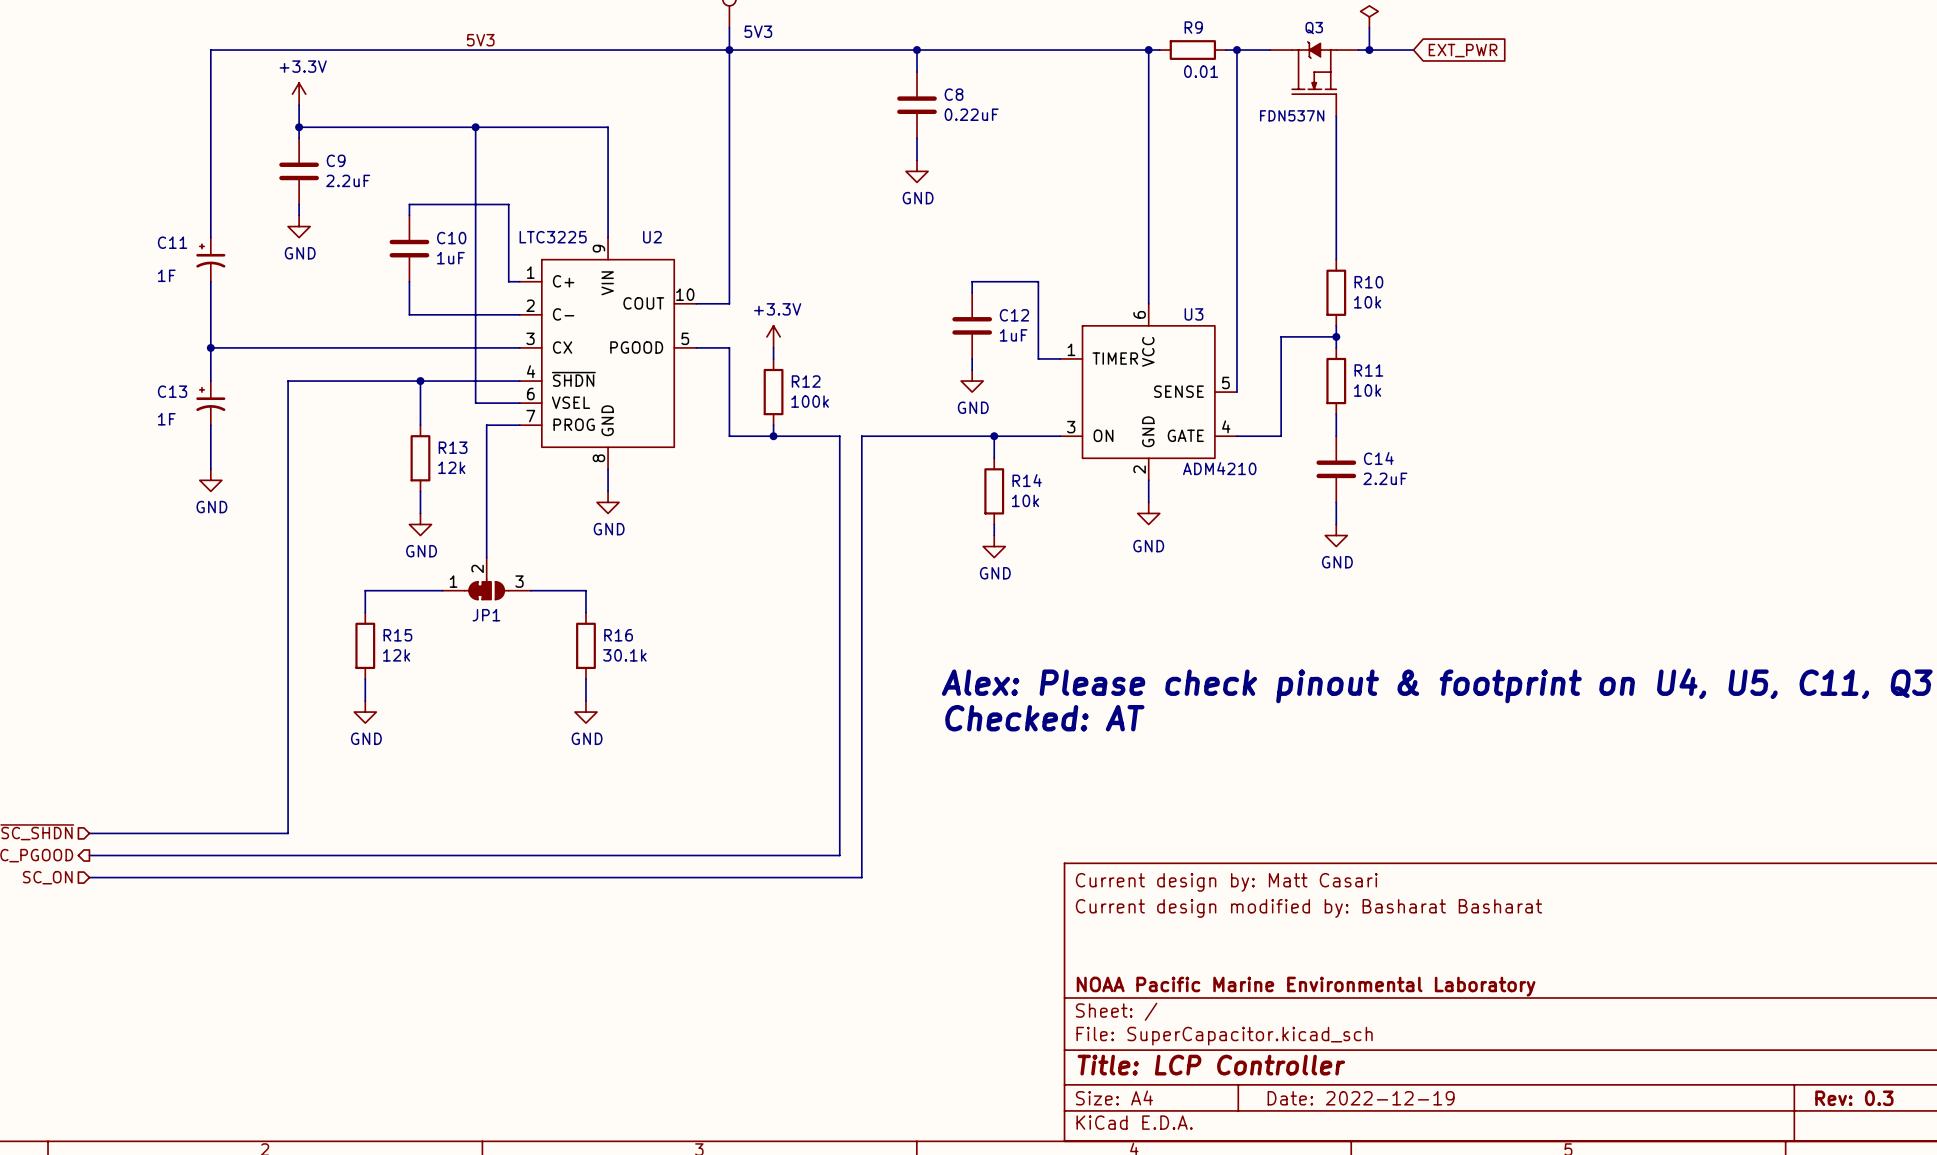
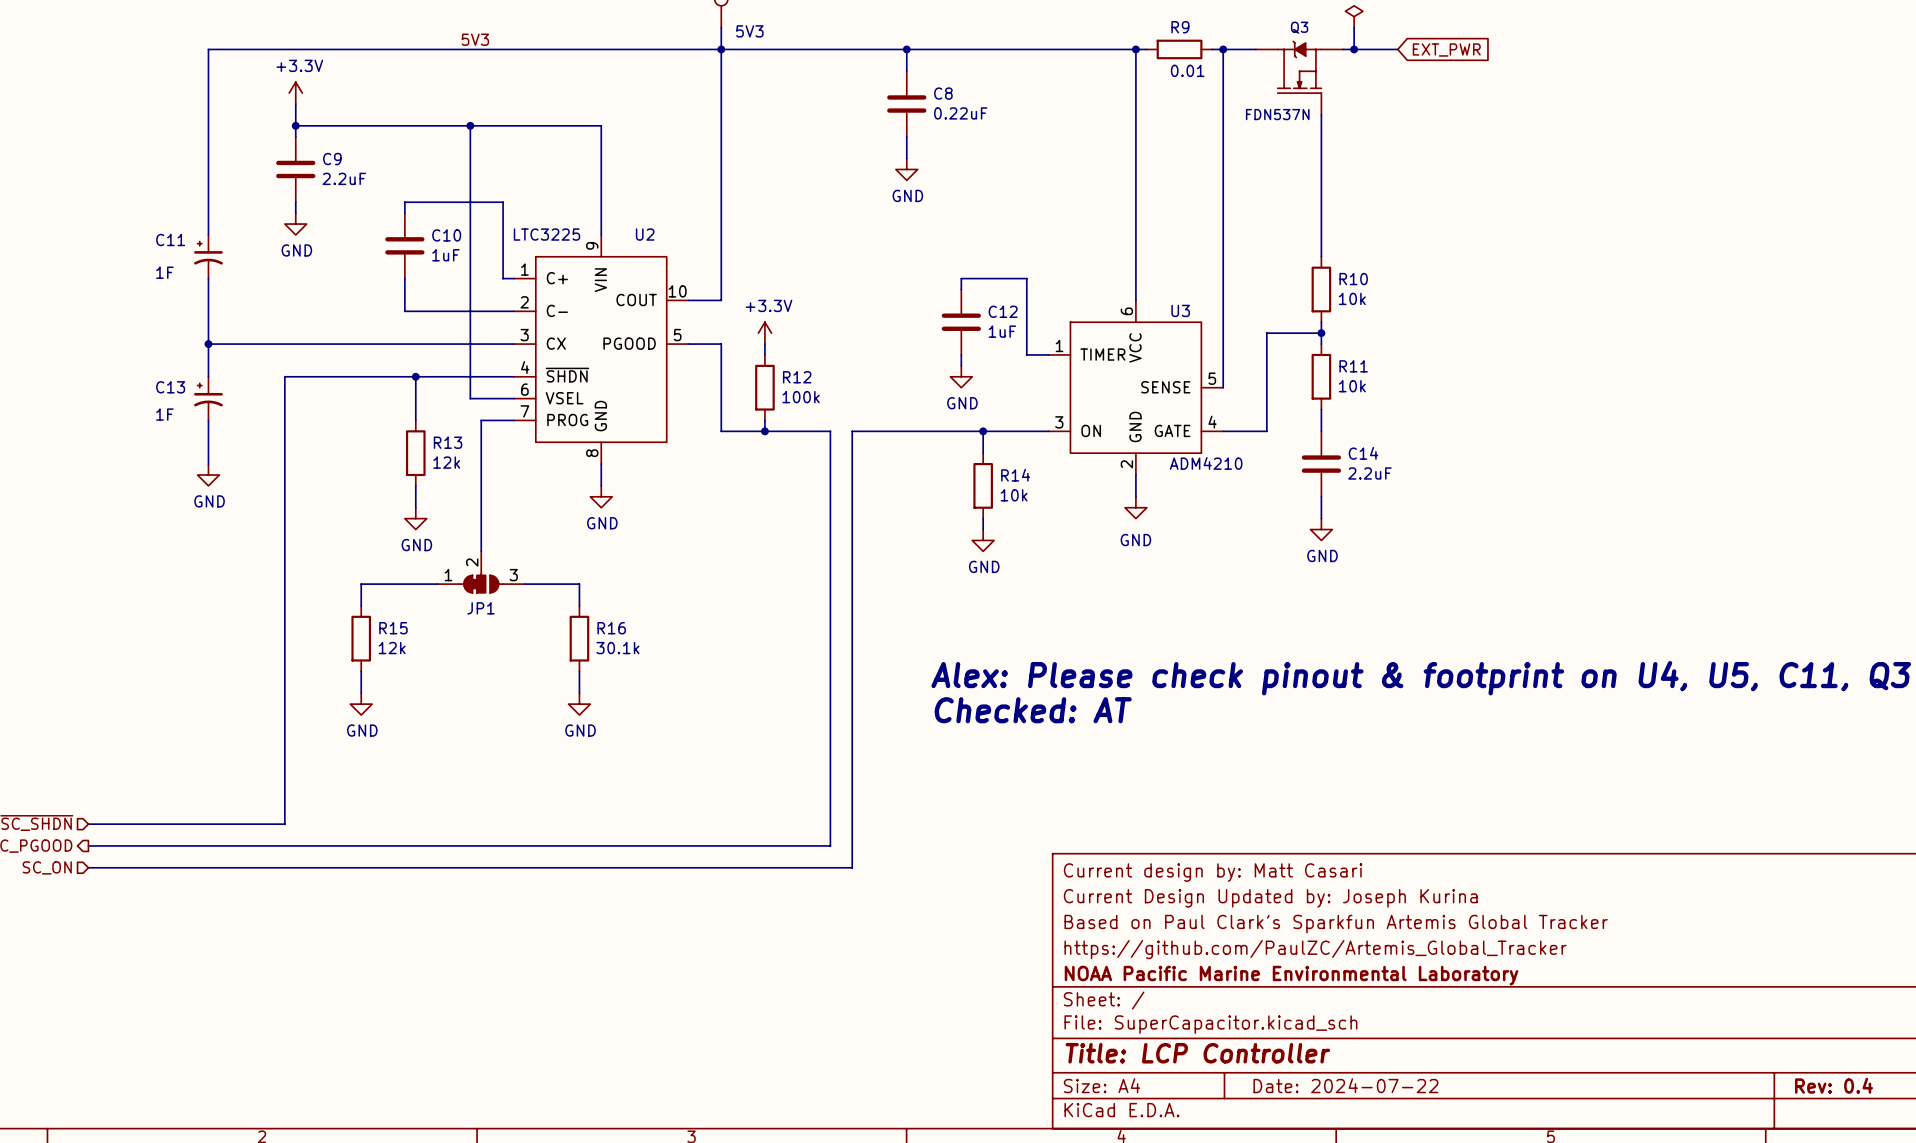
title block: Current design modified by: Basharat Basharat (1308, 908) -> Current Design Updated by: Joseph Kurina (1270, 898)
title block: none -> Based on Paul Clark's Sparkfun Artemis Global Tracker (1336, 924)
title block: none -> https://github.com/PaulZC/Artemis_Global_Tracker (1315, 949)
title block: Date: 2022-12-19 (1361, 1098) -> Date: 2024-07-22 (1345, 1085)
title block: Rev: 0.3 (1854, 1098) -> Rev: 0.4 (1834, 1085)

